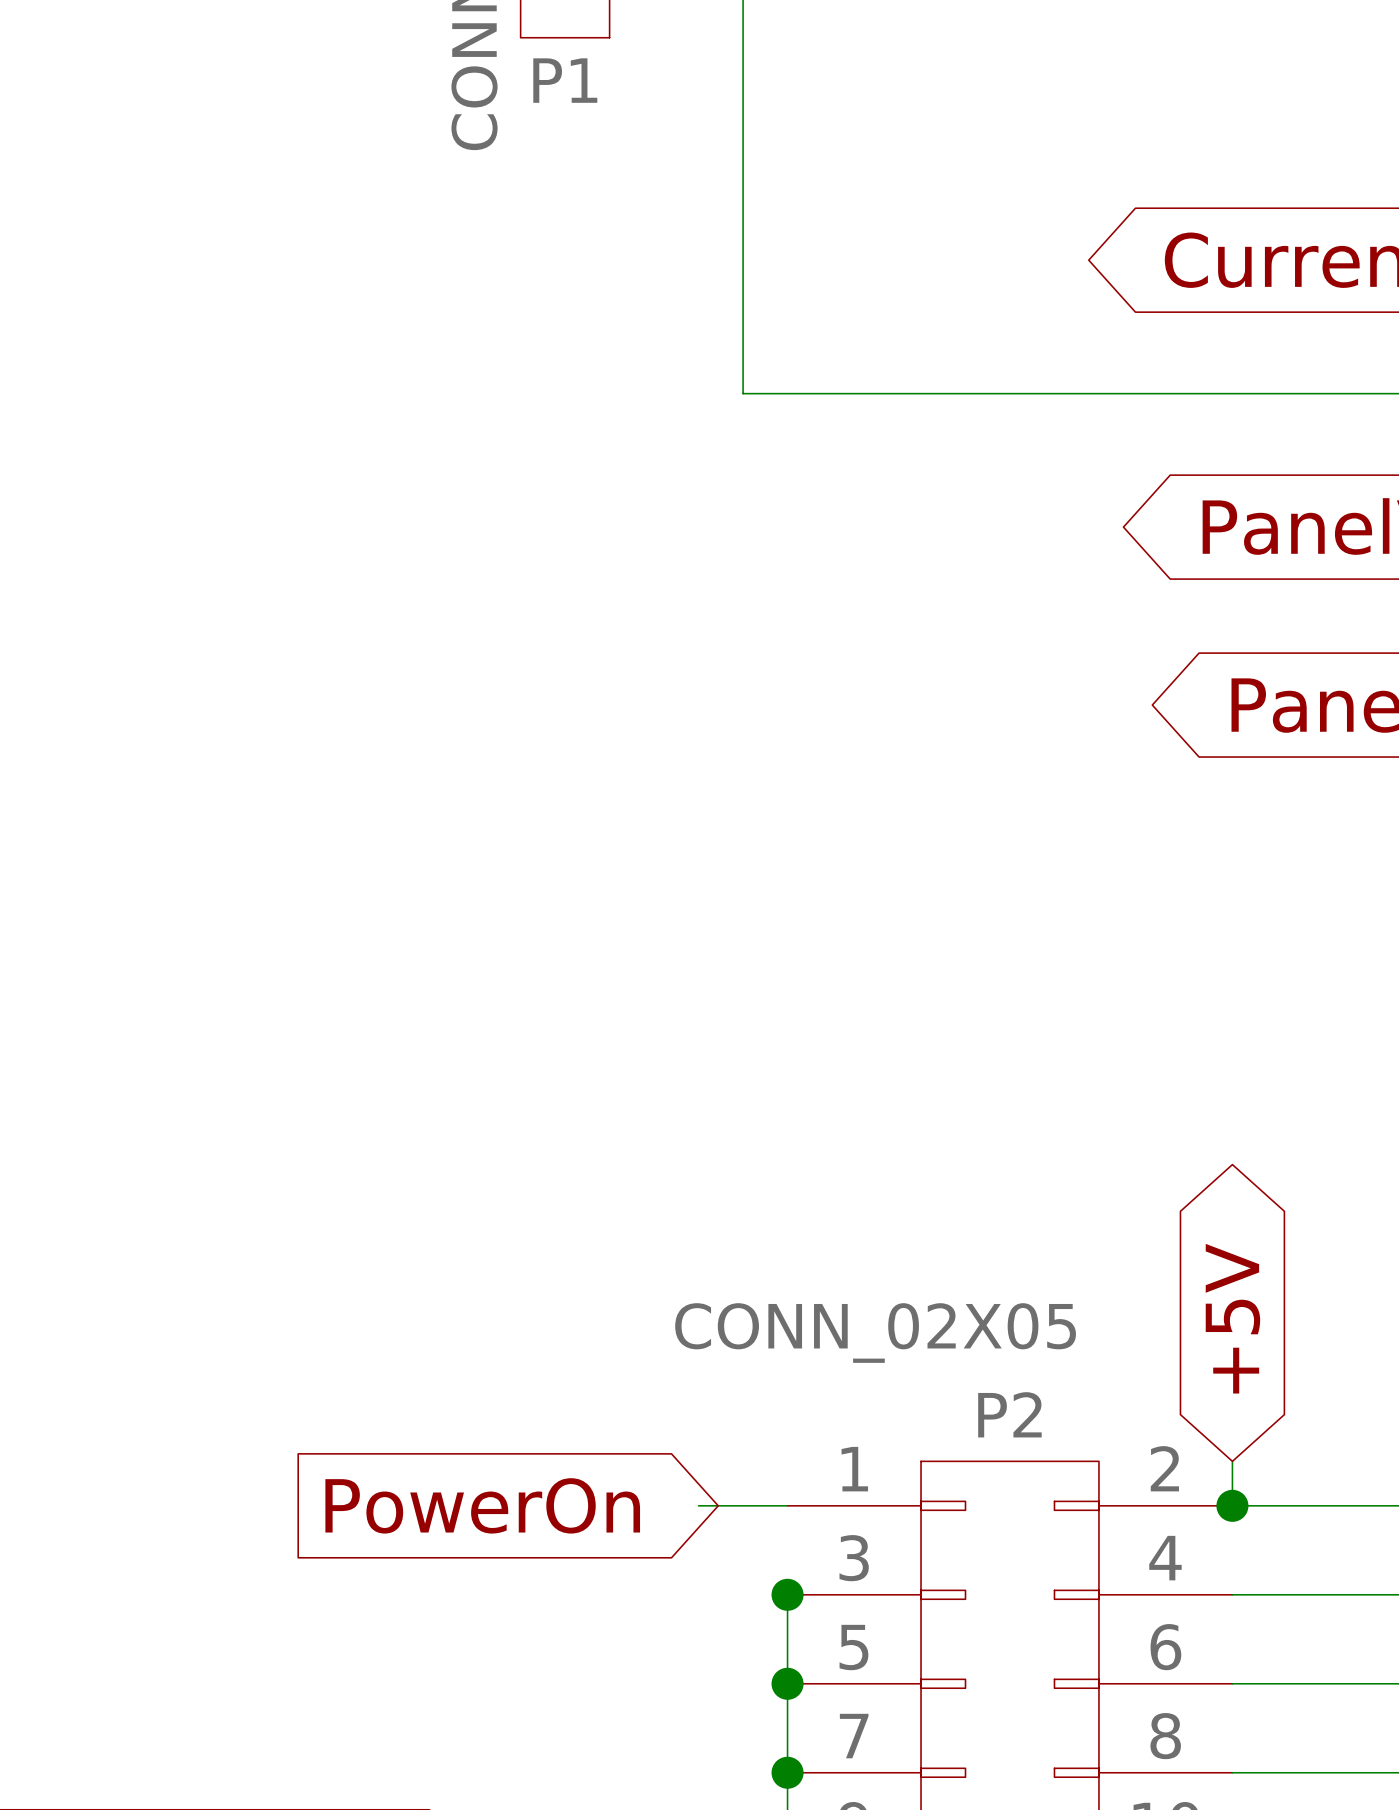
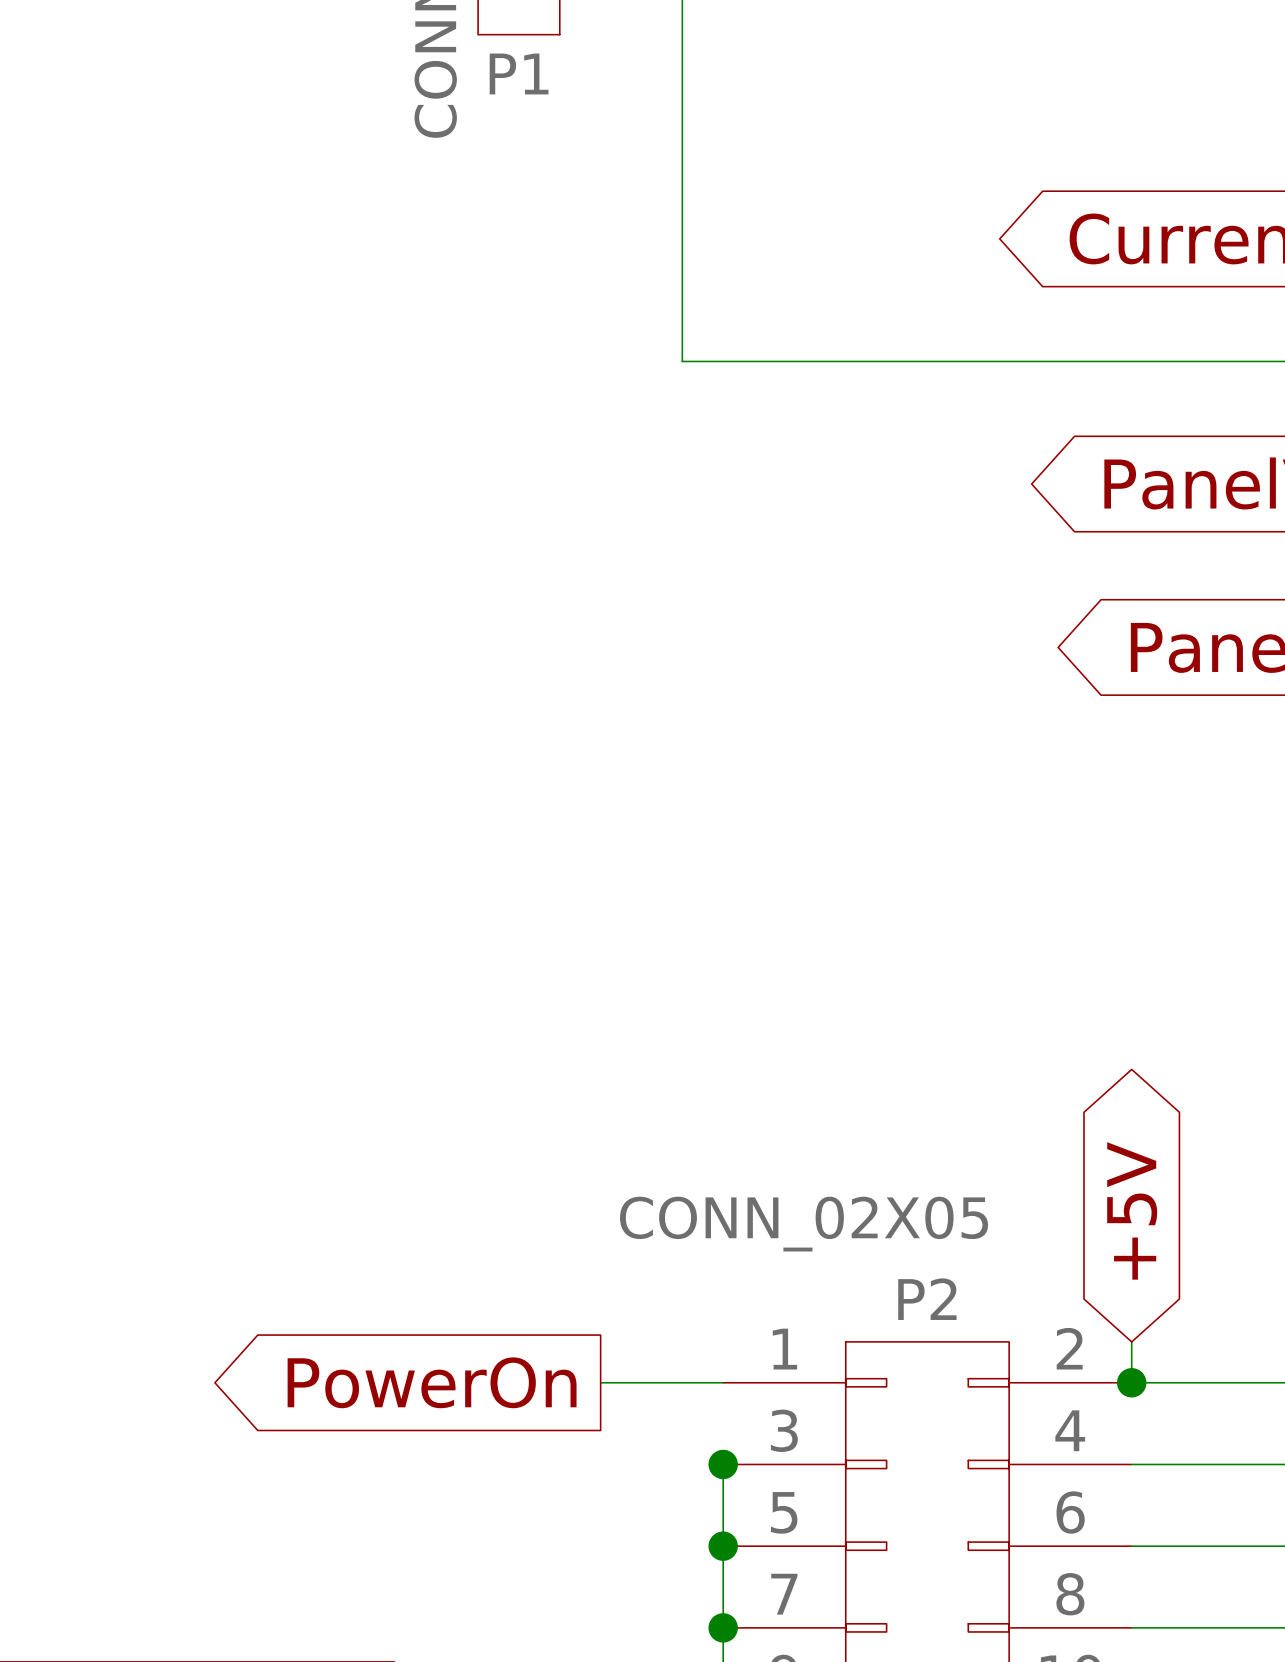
global label rotation: 0° (482, 1505) -> 180° (432, 1382)
wire: none -> (600, 1382) (641, 1382)

